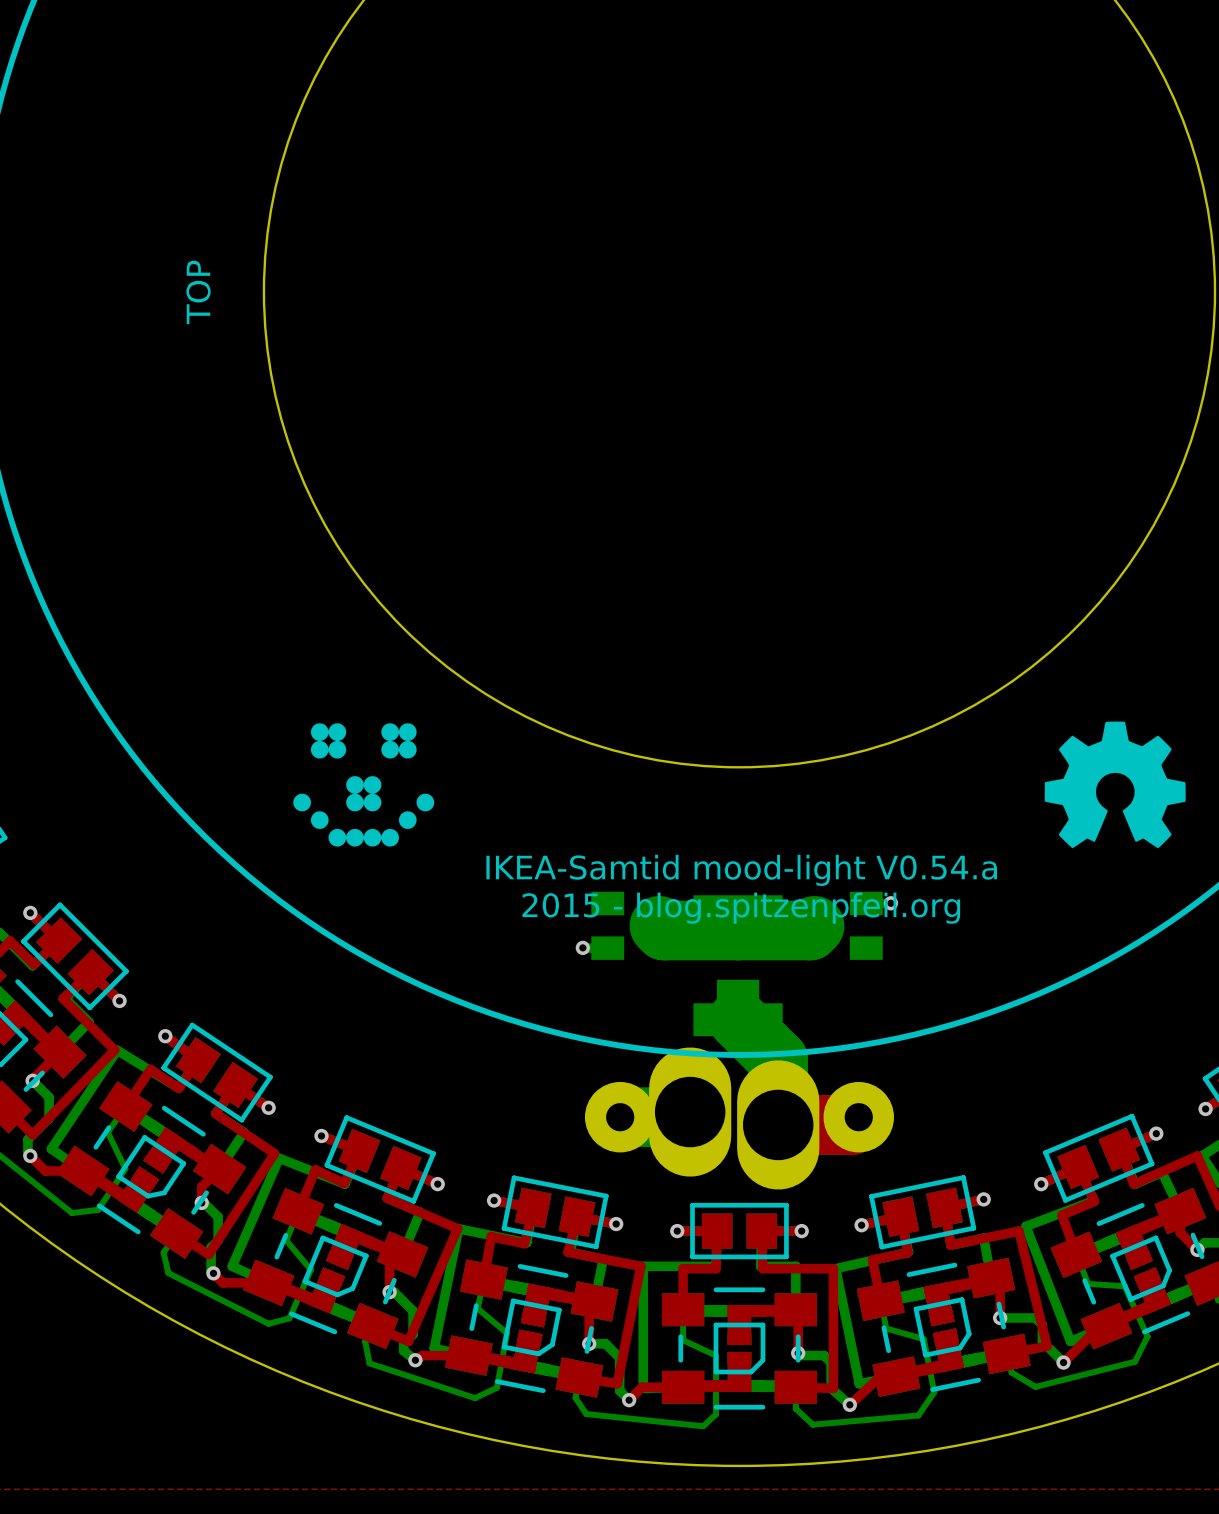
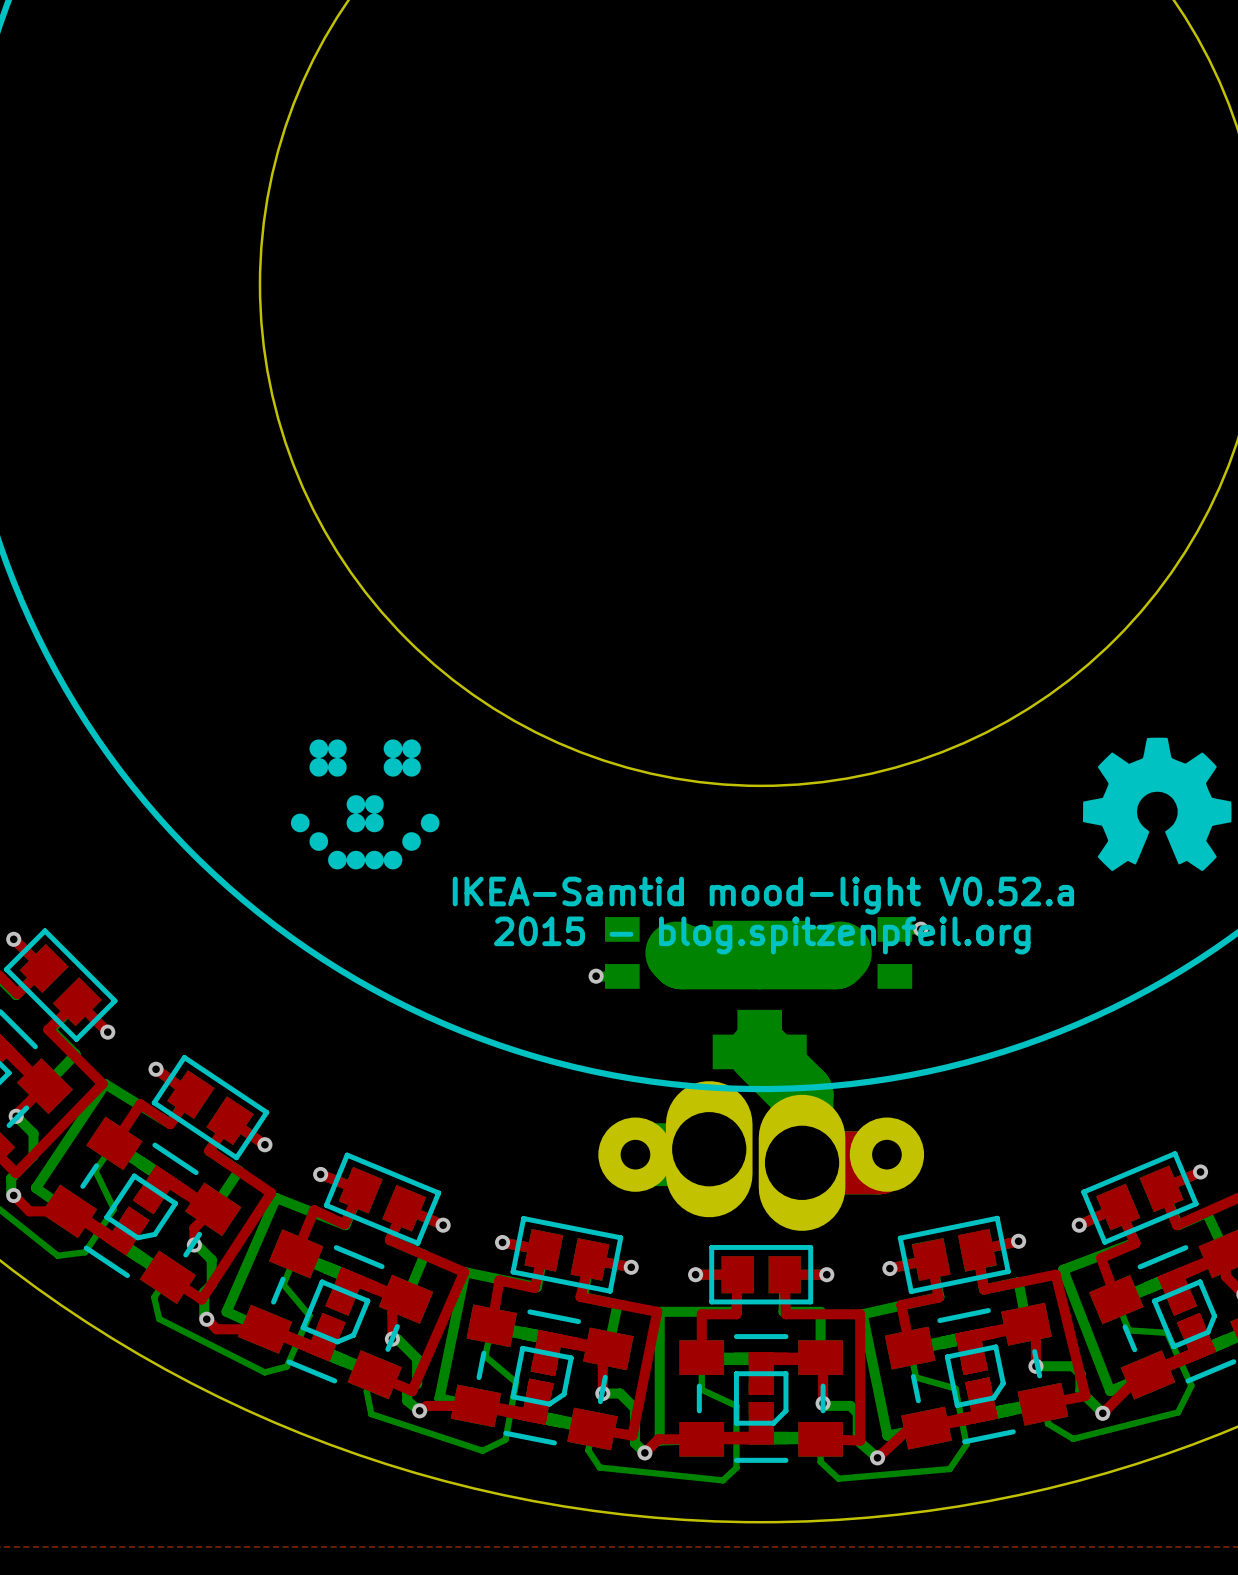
text: TOP (198, 292) -> none
text: IKEA-Samtid mood-light V0.54.a (741, 870) -> IKEA-Samtid mood-light V0.52.a (763, 895)

